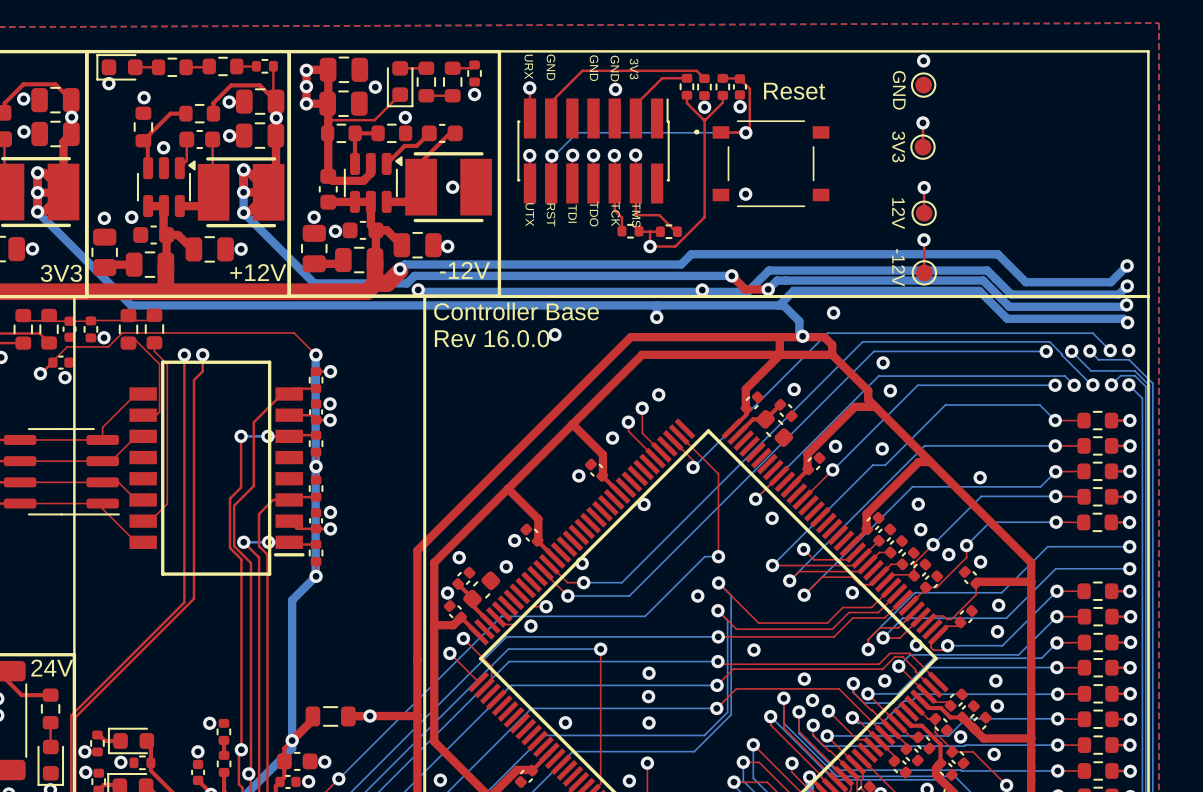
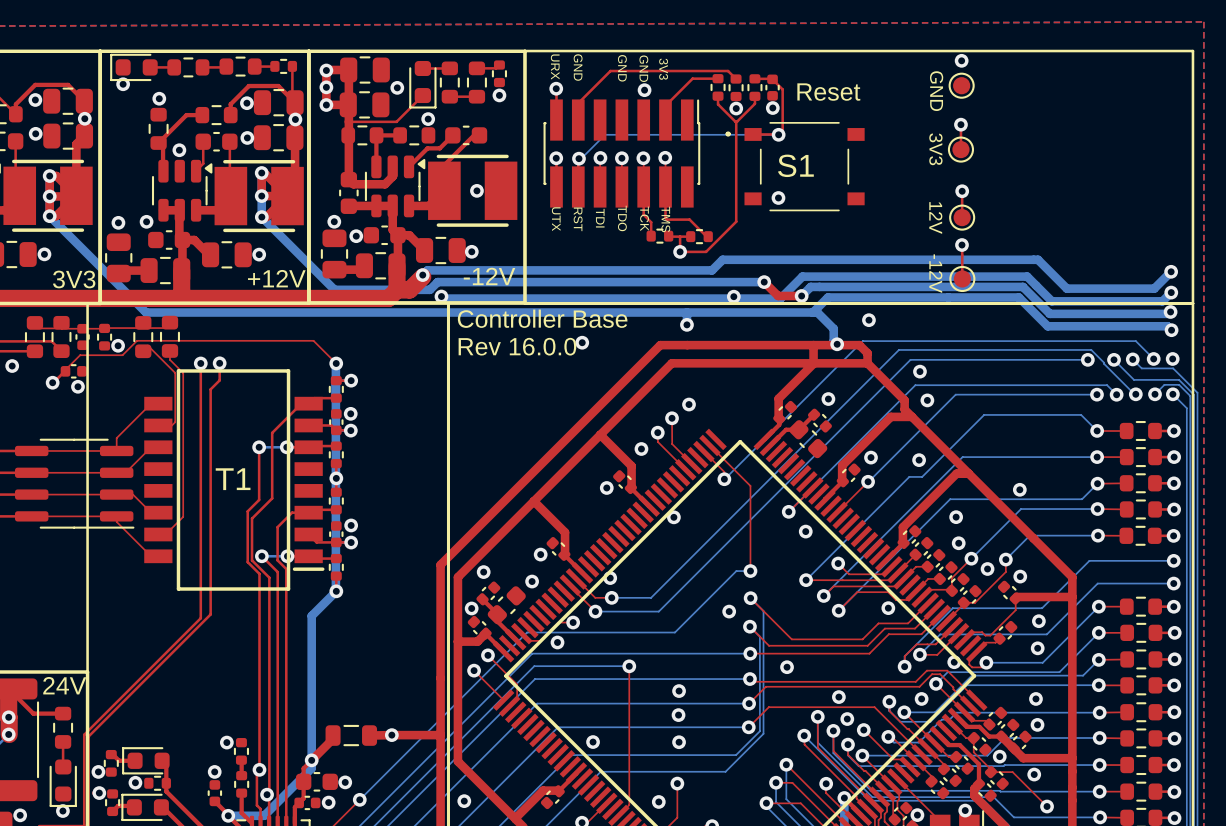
S1 name: none -> S1 (795, 165)
T1 name: none -> T1 (233, 479)

